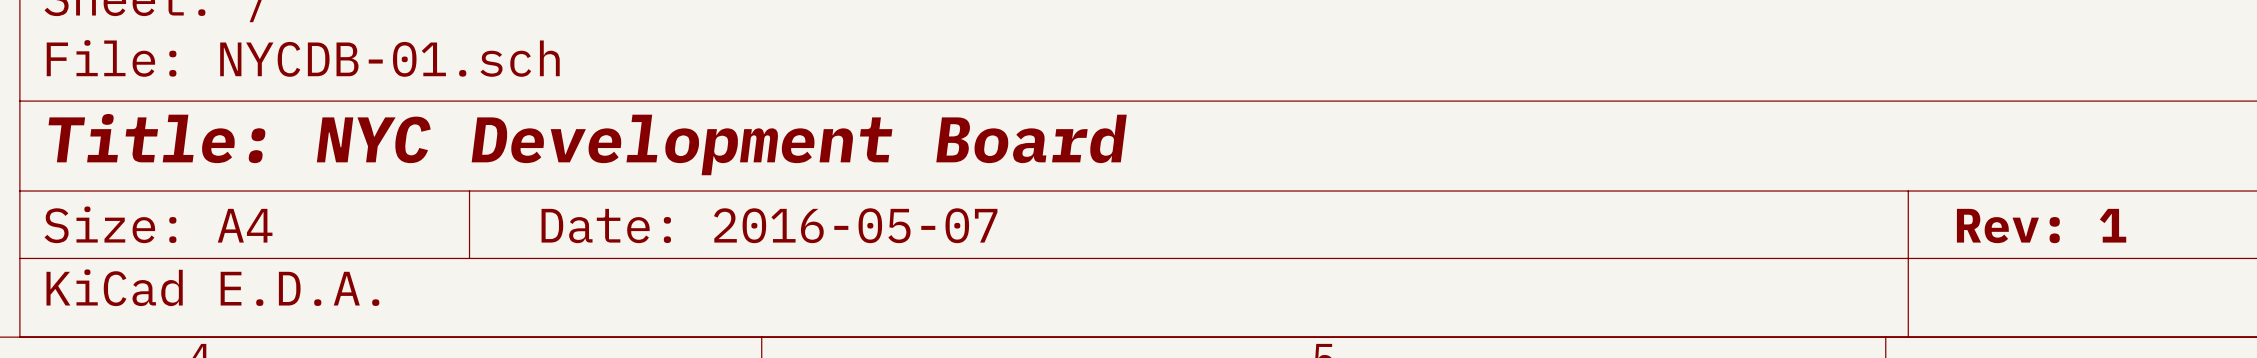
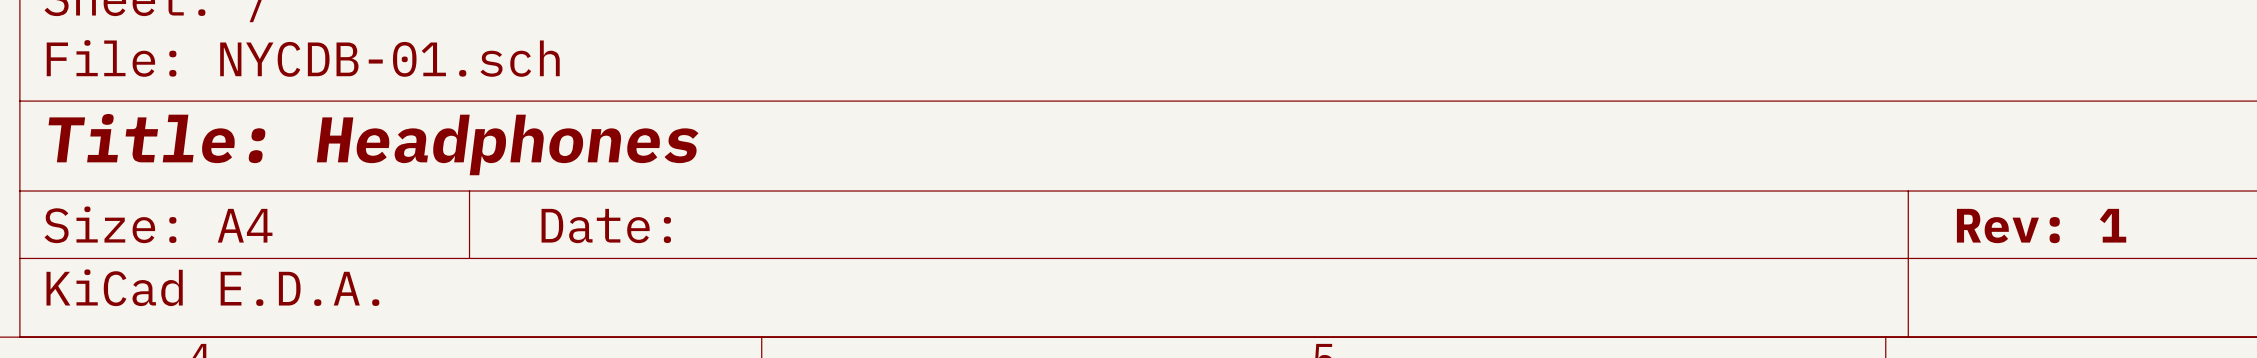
title block: Title: NYC Development Board (587, 144) -> Title: Headphones (373, 144)
title block: Date: 2016-05-07 (769, 225) -> Date: (606, 226)

